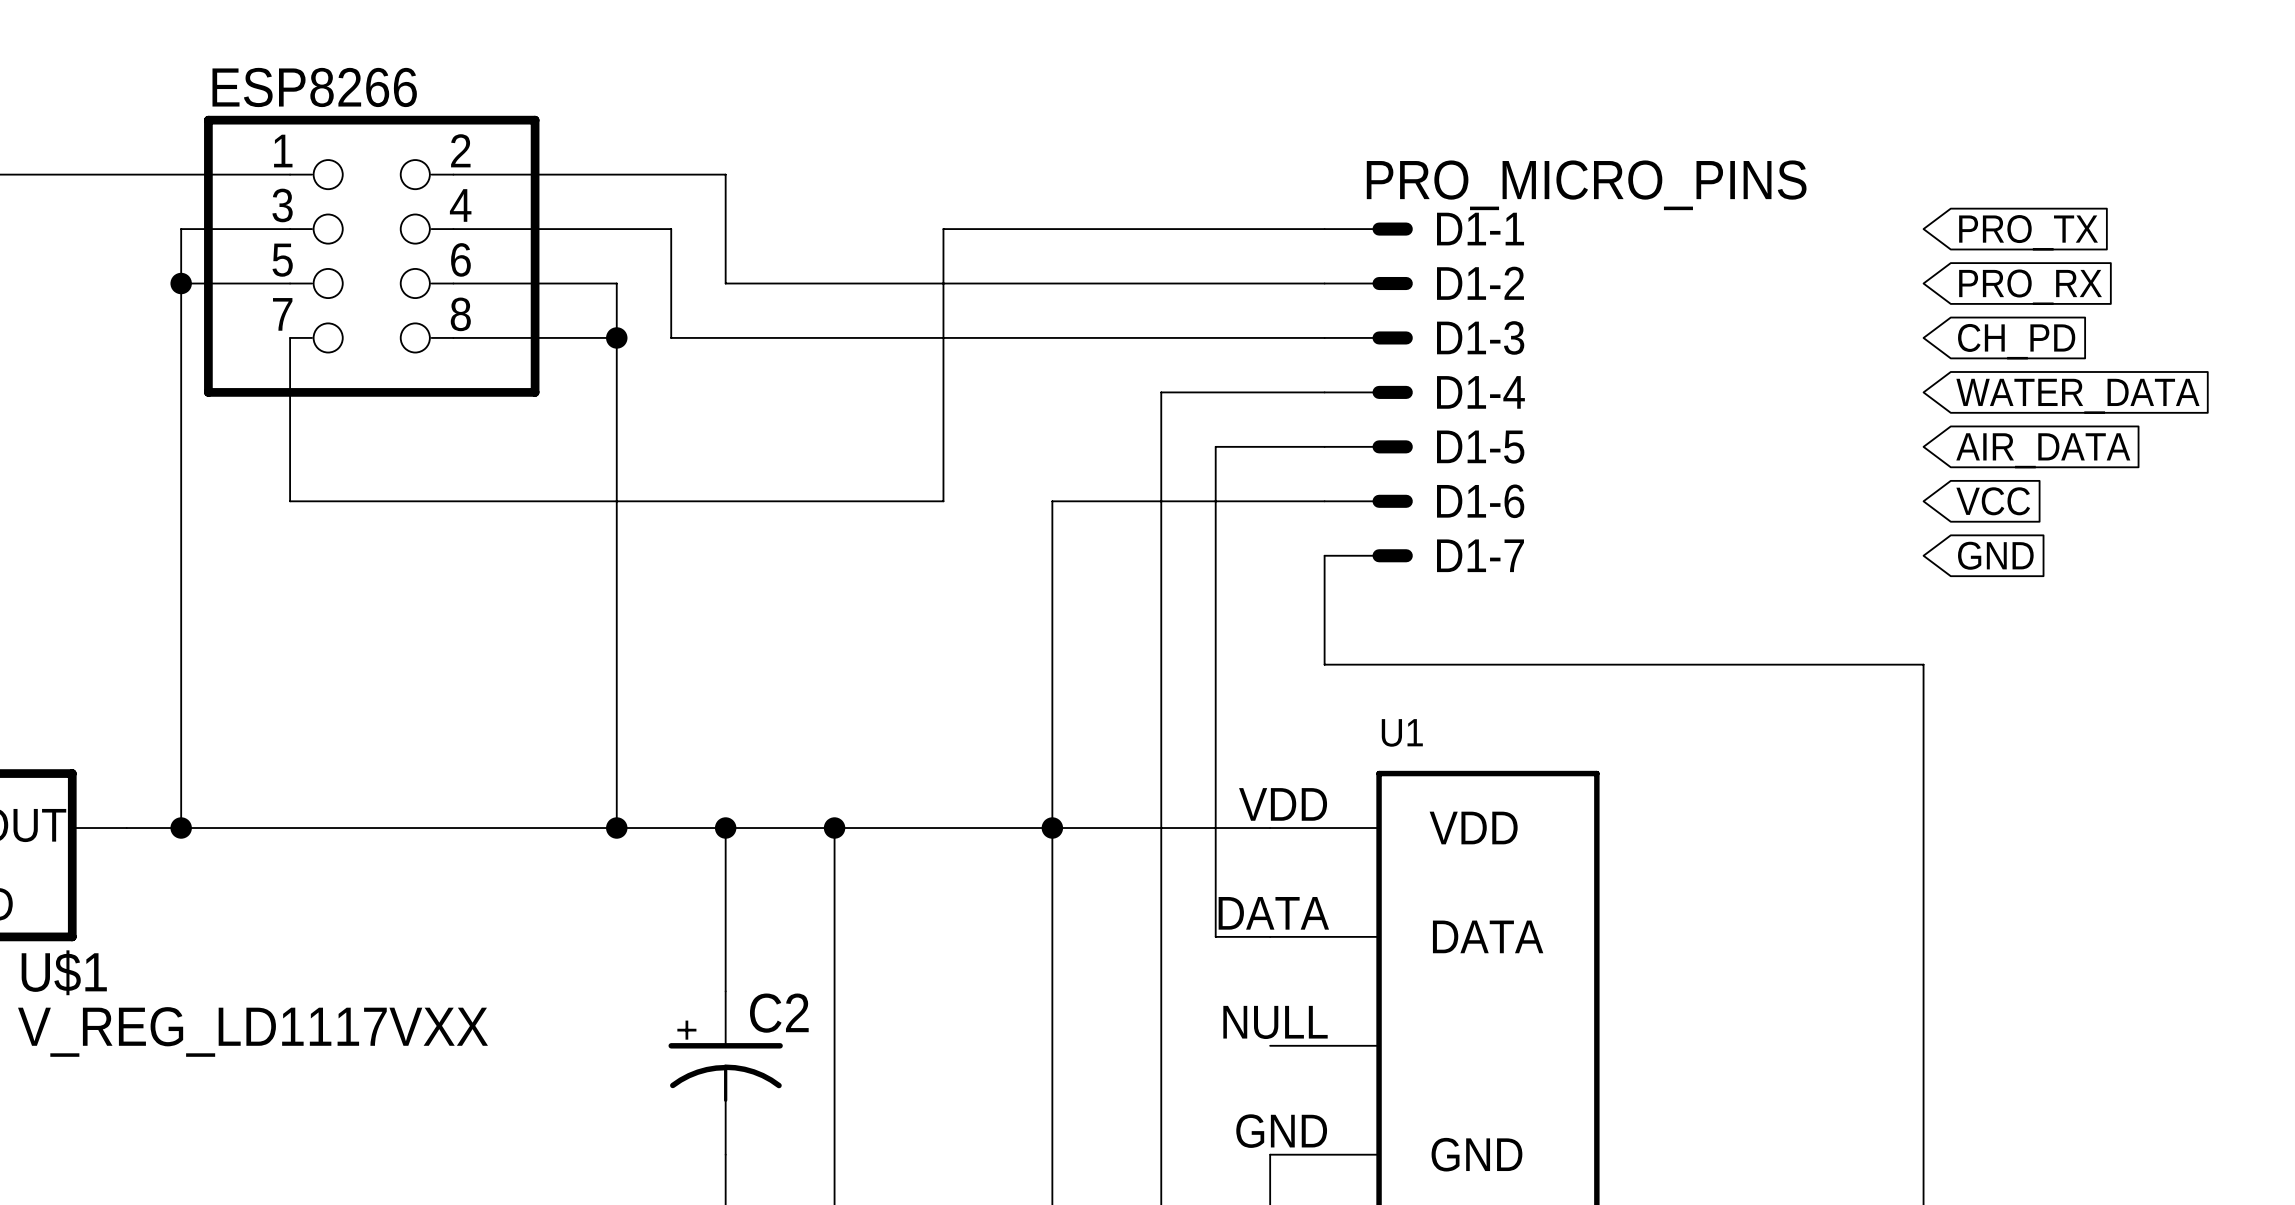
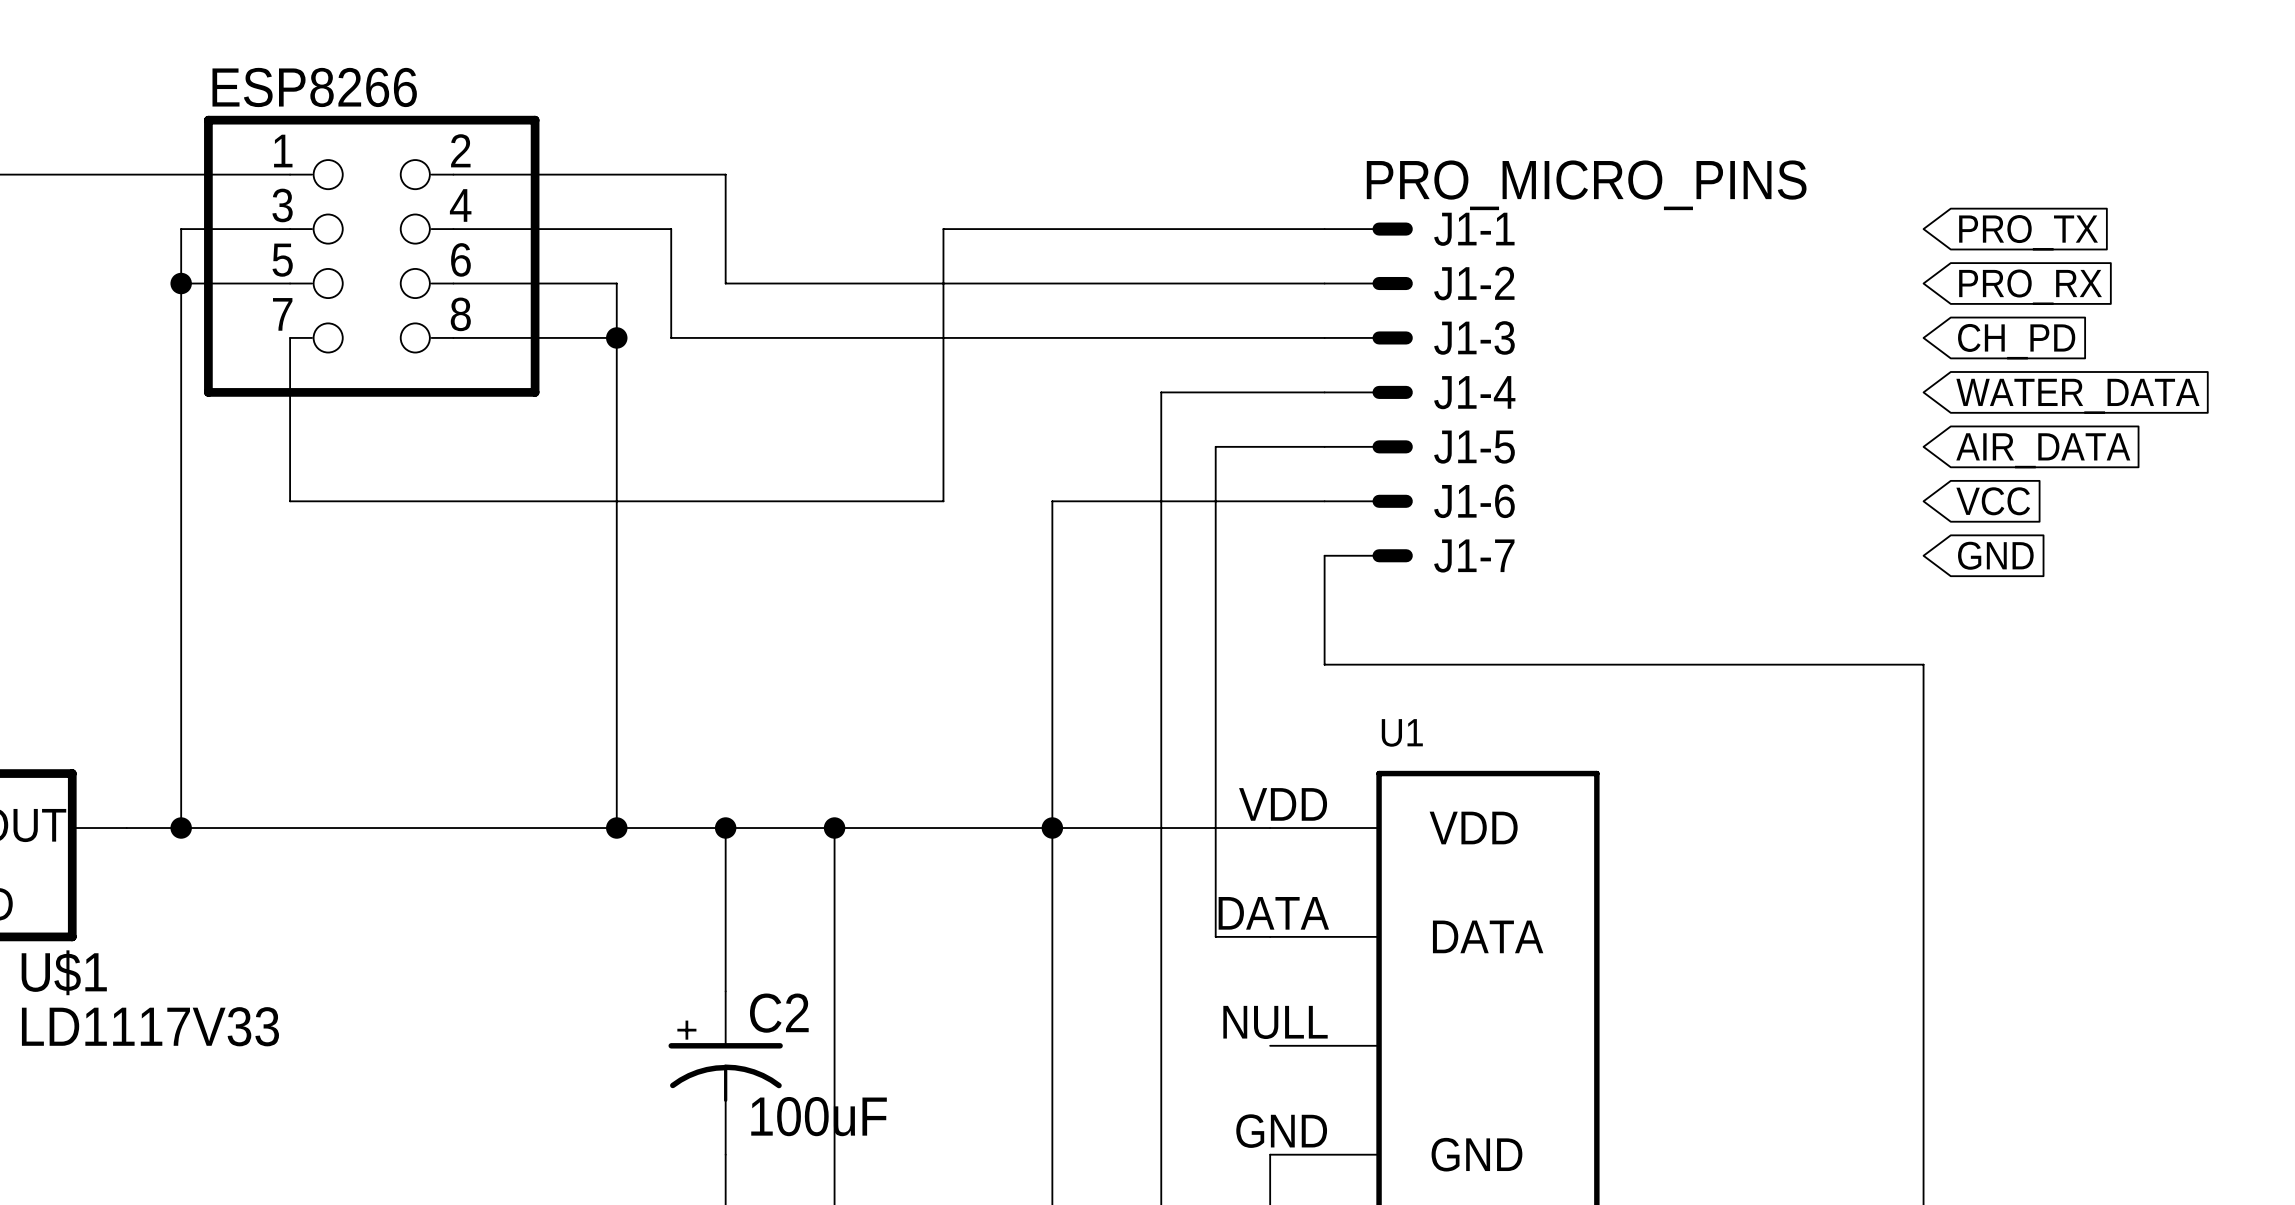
D1-1 name: D1-1 (1480, 229) -> J1-1 (1474, 229)
D1-2 name: D1-2 (1480, 283) -> J1-2 (1474, 283)
D1-3 name: D1-3 (1480, 337) -> J1-3 (1474, 337)
D1-4 name: D1-4 (1480, 392) -> J1-4 (1474, 392)
D1-5 name: D1-5 (1480, 447) -> J1-5 (1474, 447)
D1-6 name: D1-6 (1480, 501) -> J1-6 (1474, 501)
D1-7 name: D1-7 (1480, 555) -> J1-7 (1474, 555)
U$1 value: V_REG_LD1117VXX (253, 1031) -> LD1117V33 (150, 1026)
C2 value: none -> 100uF (819, 1116)

